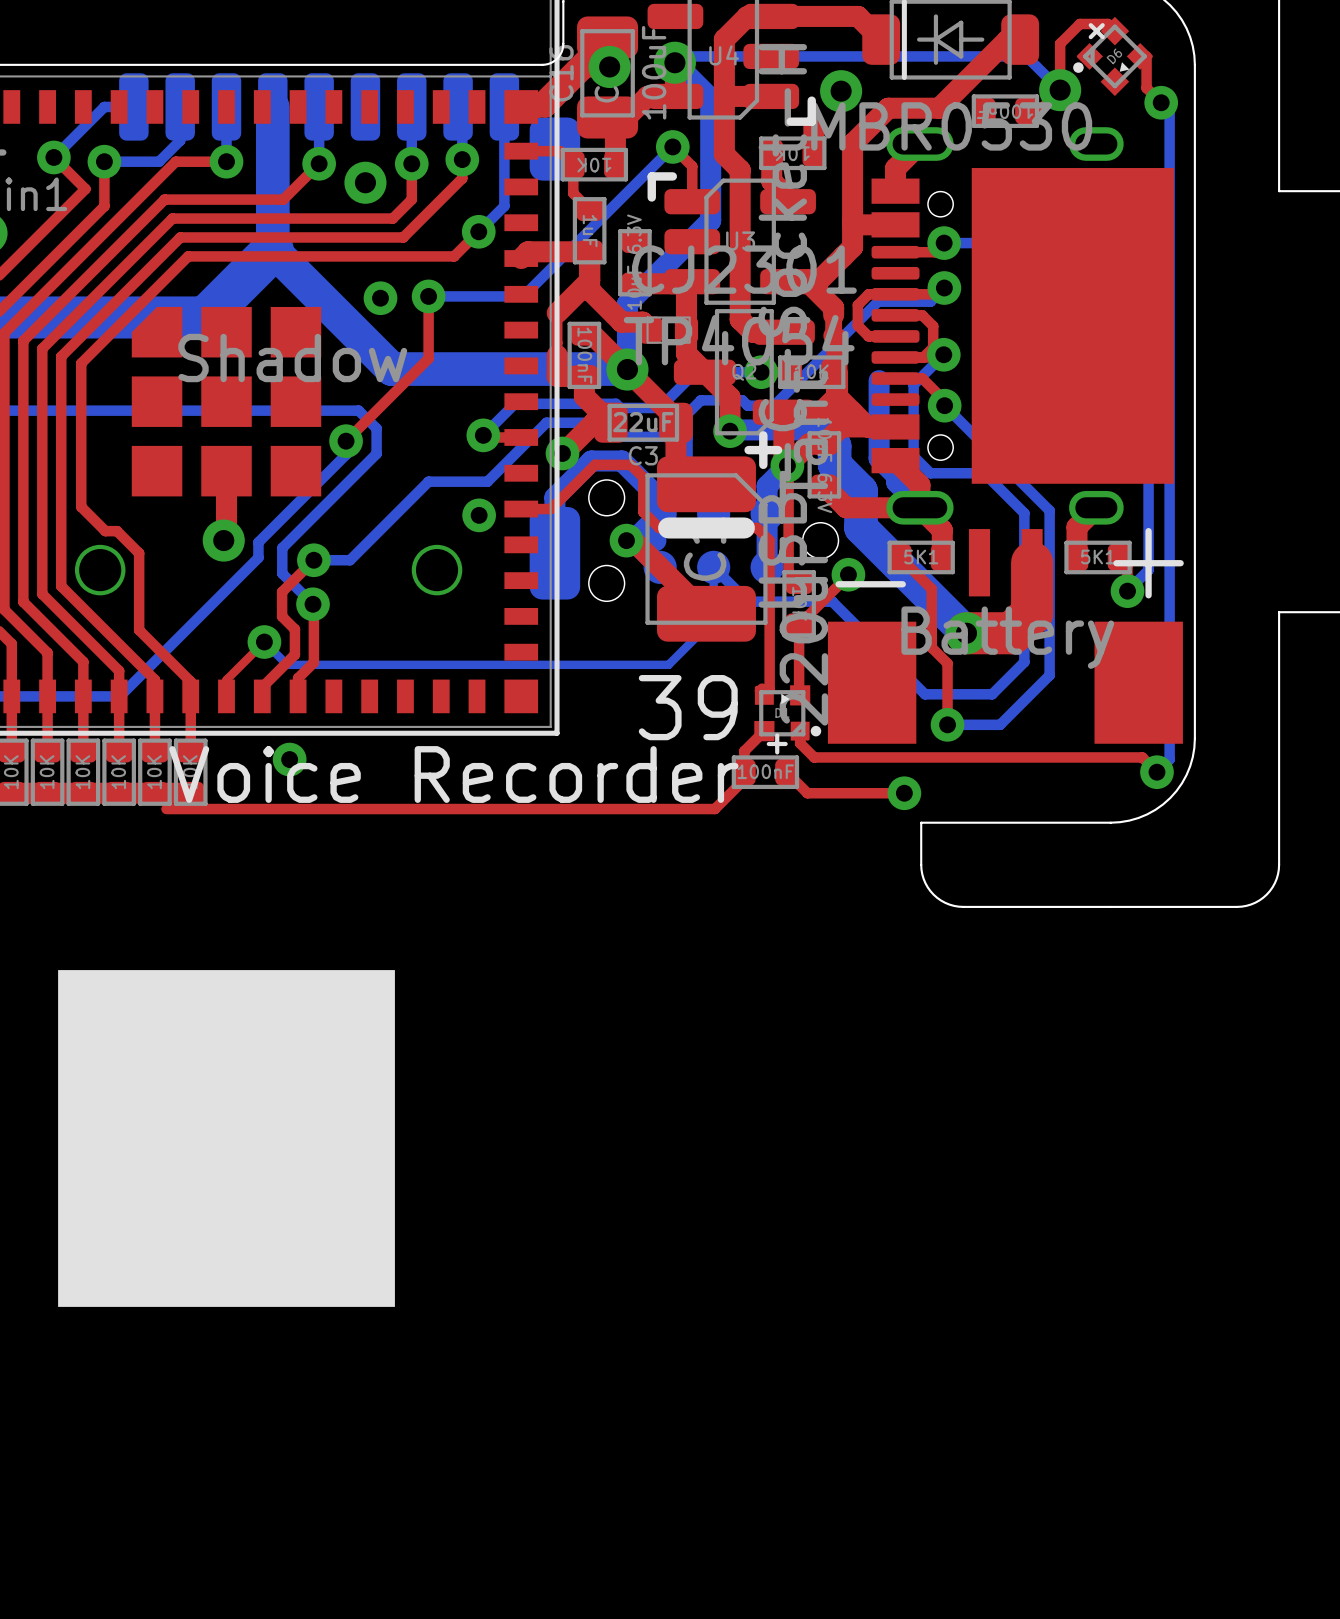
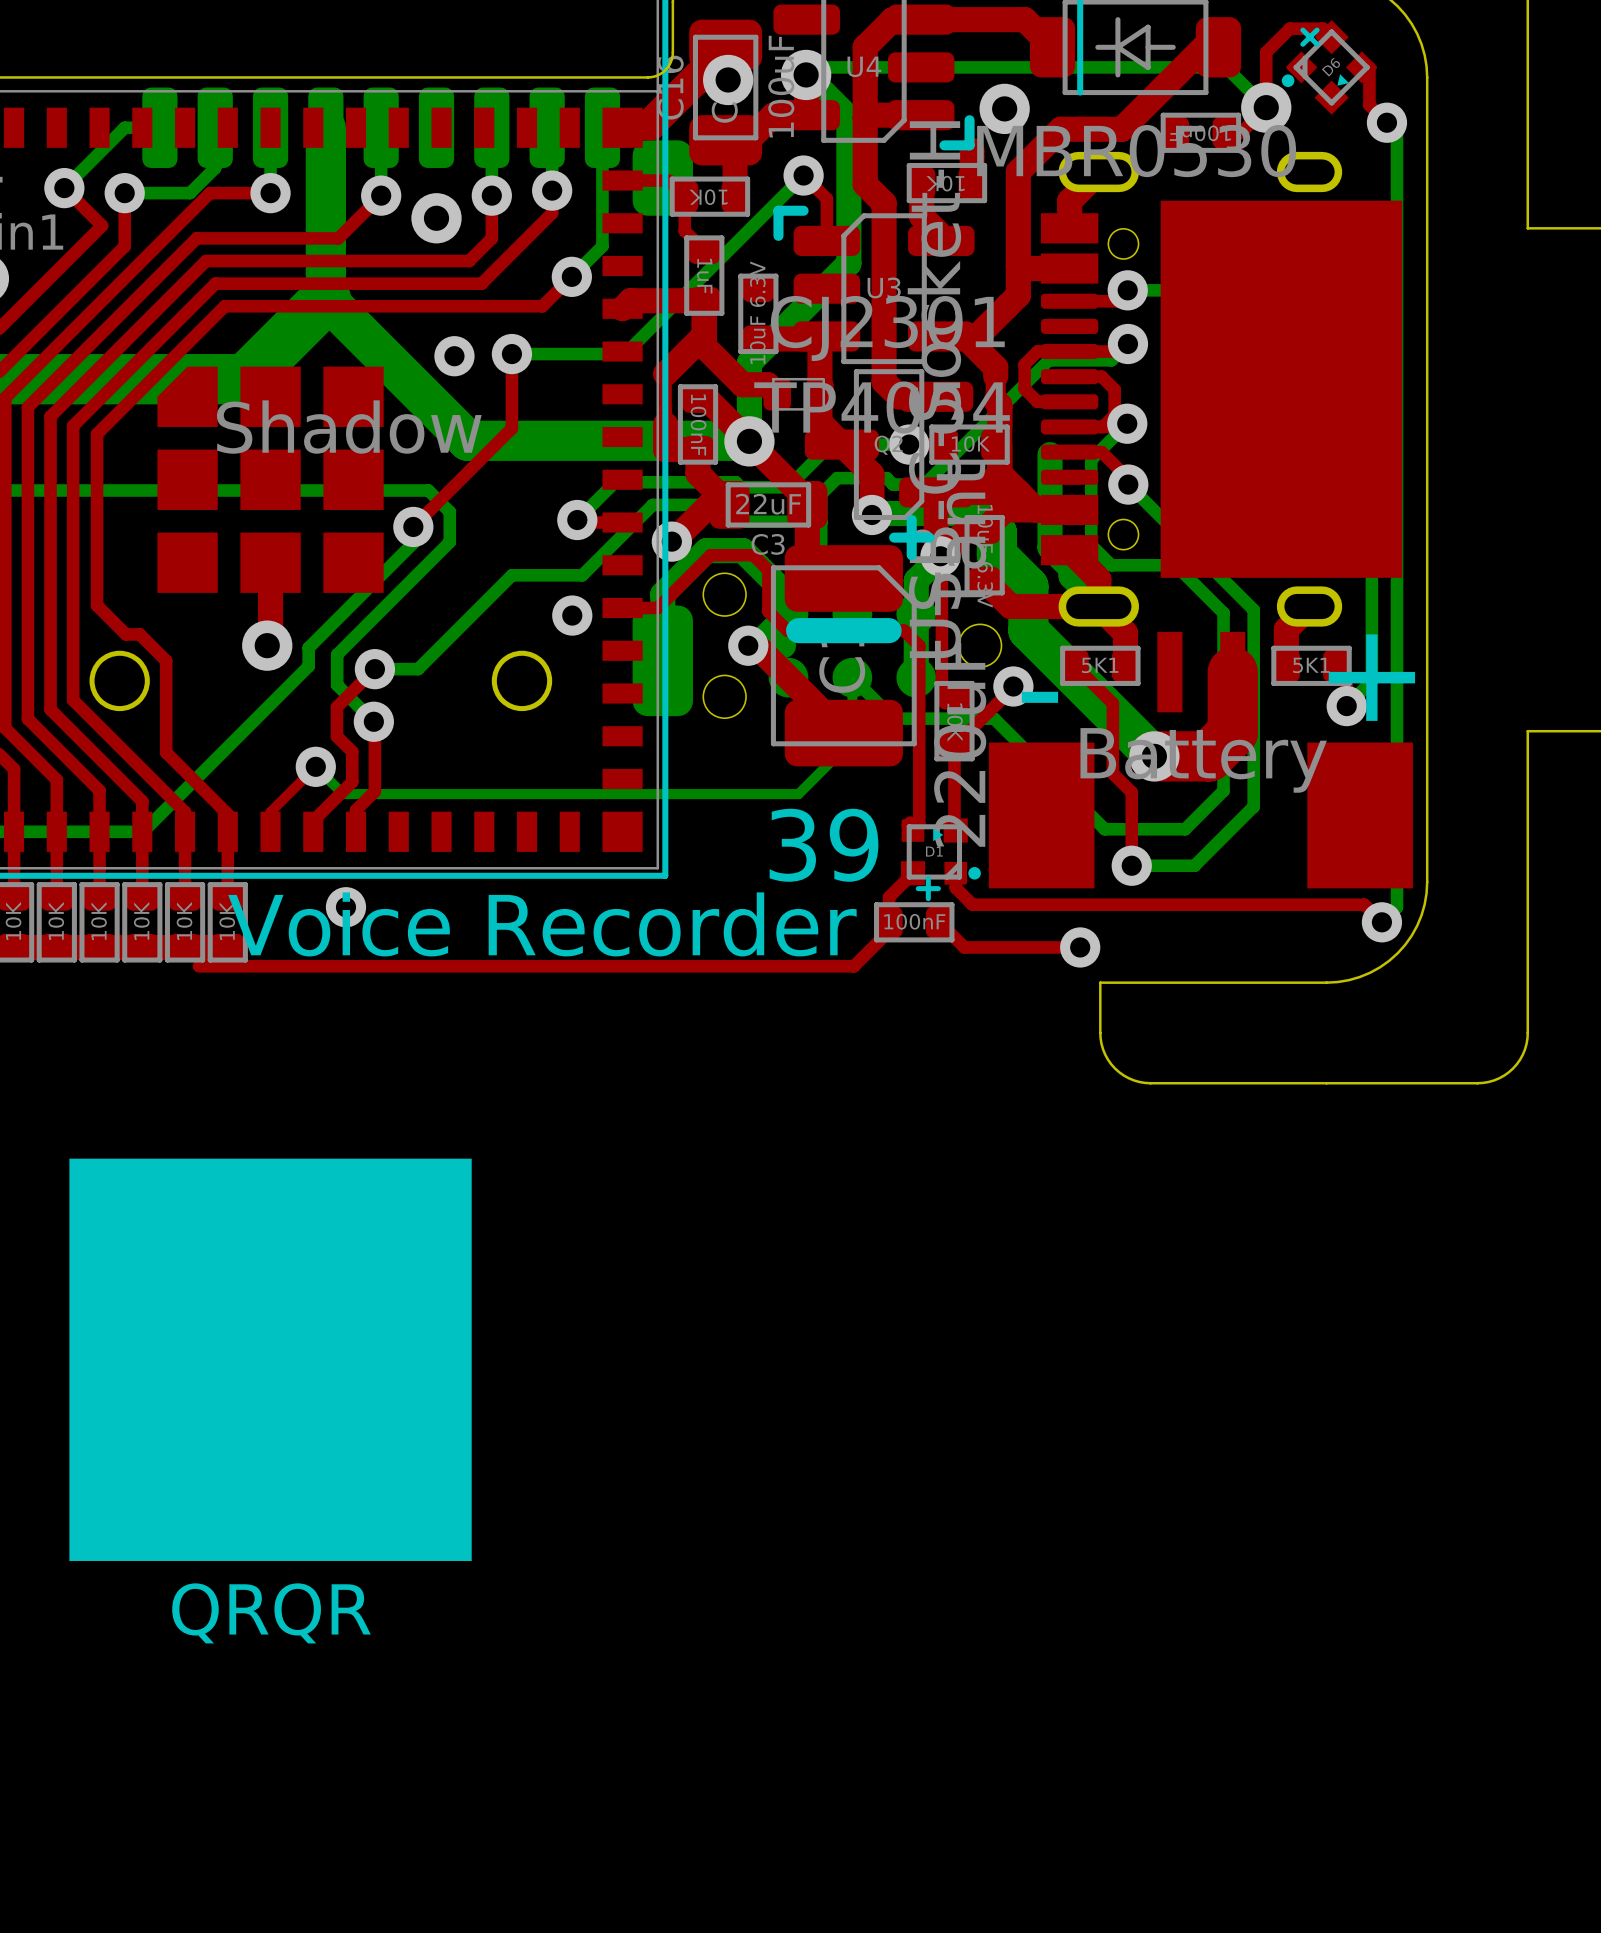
text: none -> QRQR (271, 1613)

